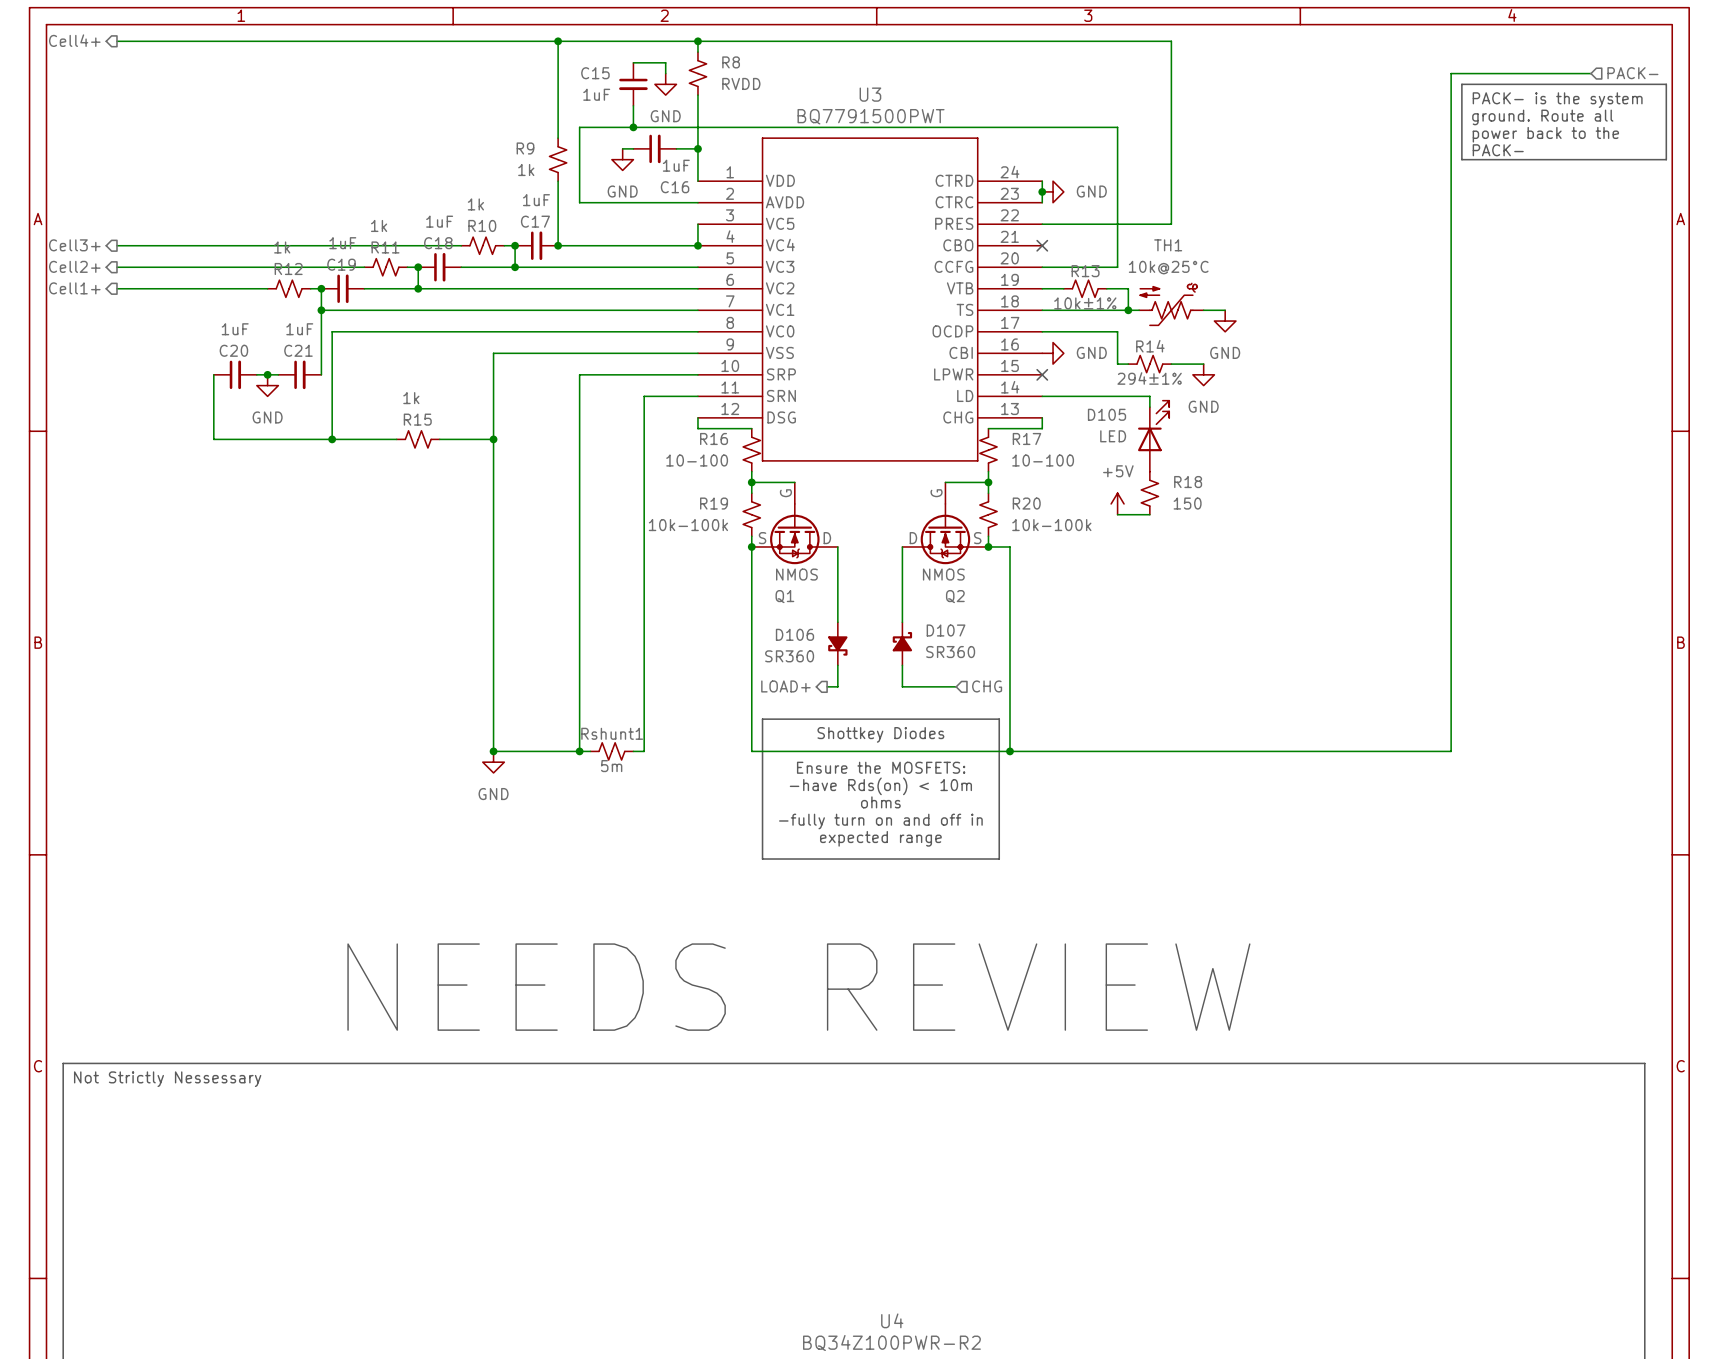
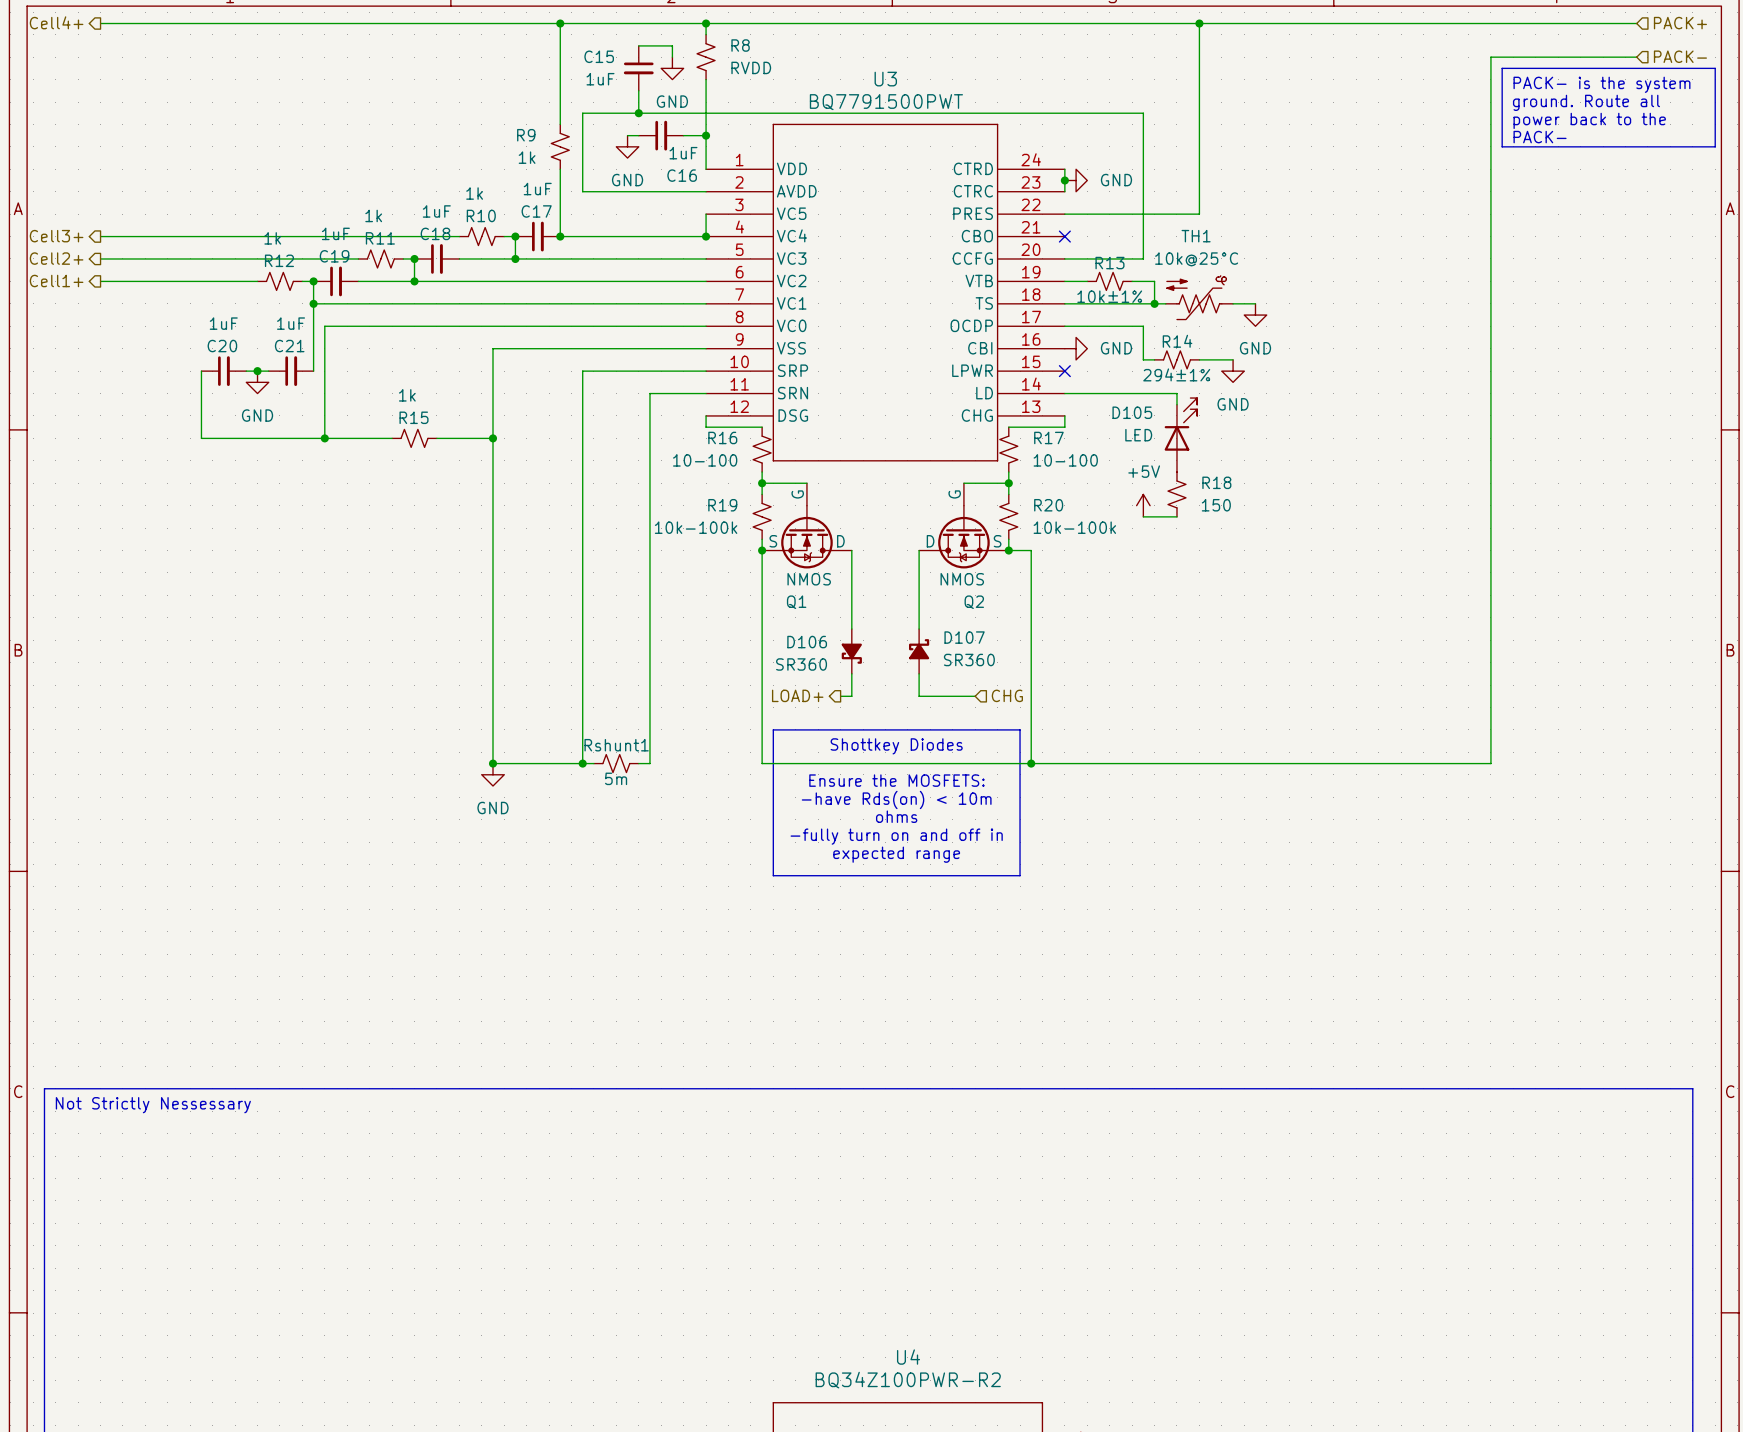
hierarchical label: none -> PACK+ (1680, 23)
wire: none -> (1199, 23) (1636, 23)
junction: none -> (1199, 23)
text: NEEDS REVIEW (798, 987) -> none

